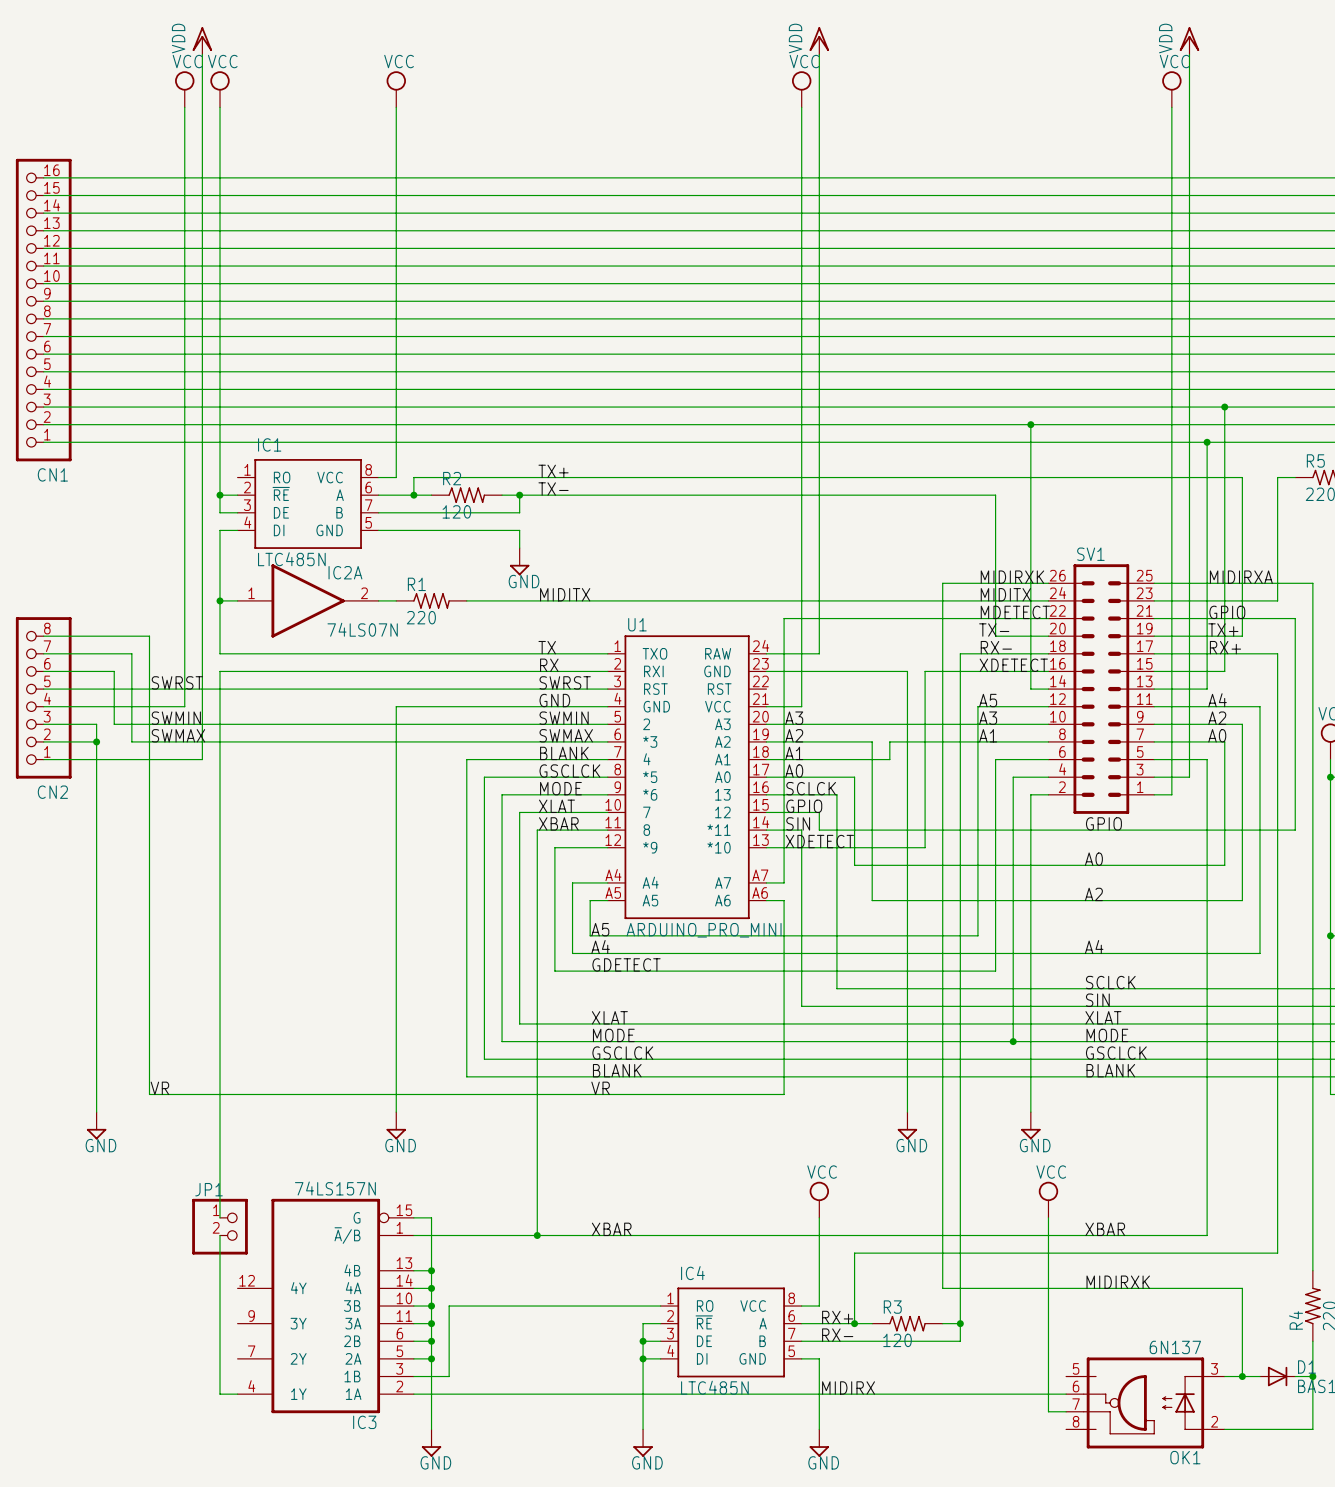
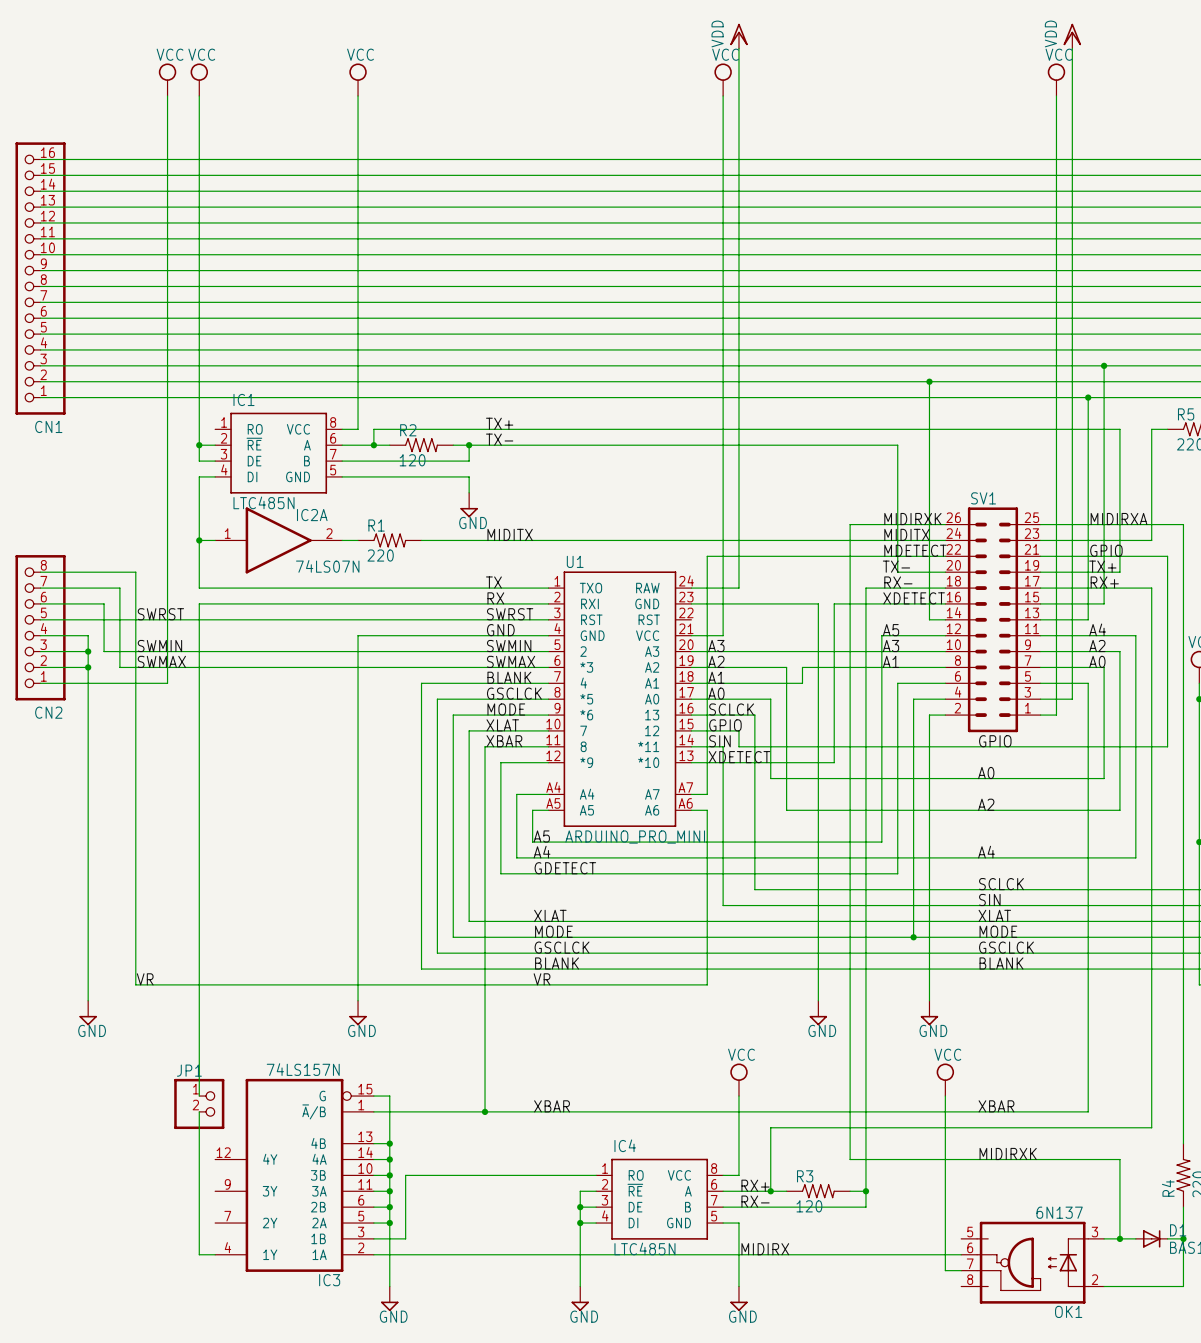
power symbol: VDD (202, 40) -> none
wire: (202, 54) (202, 759) (184, 759) -> (167, 635) (167, 683)
wire: (96, 706) (184, 706) -> (88, 635) (88, 651)
junction: none -> (88, 651)

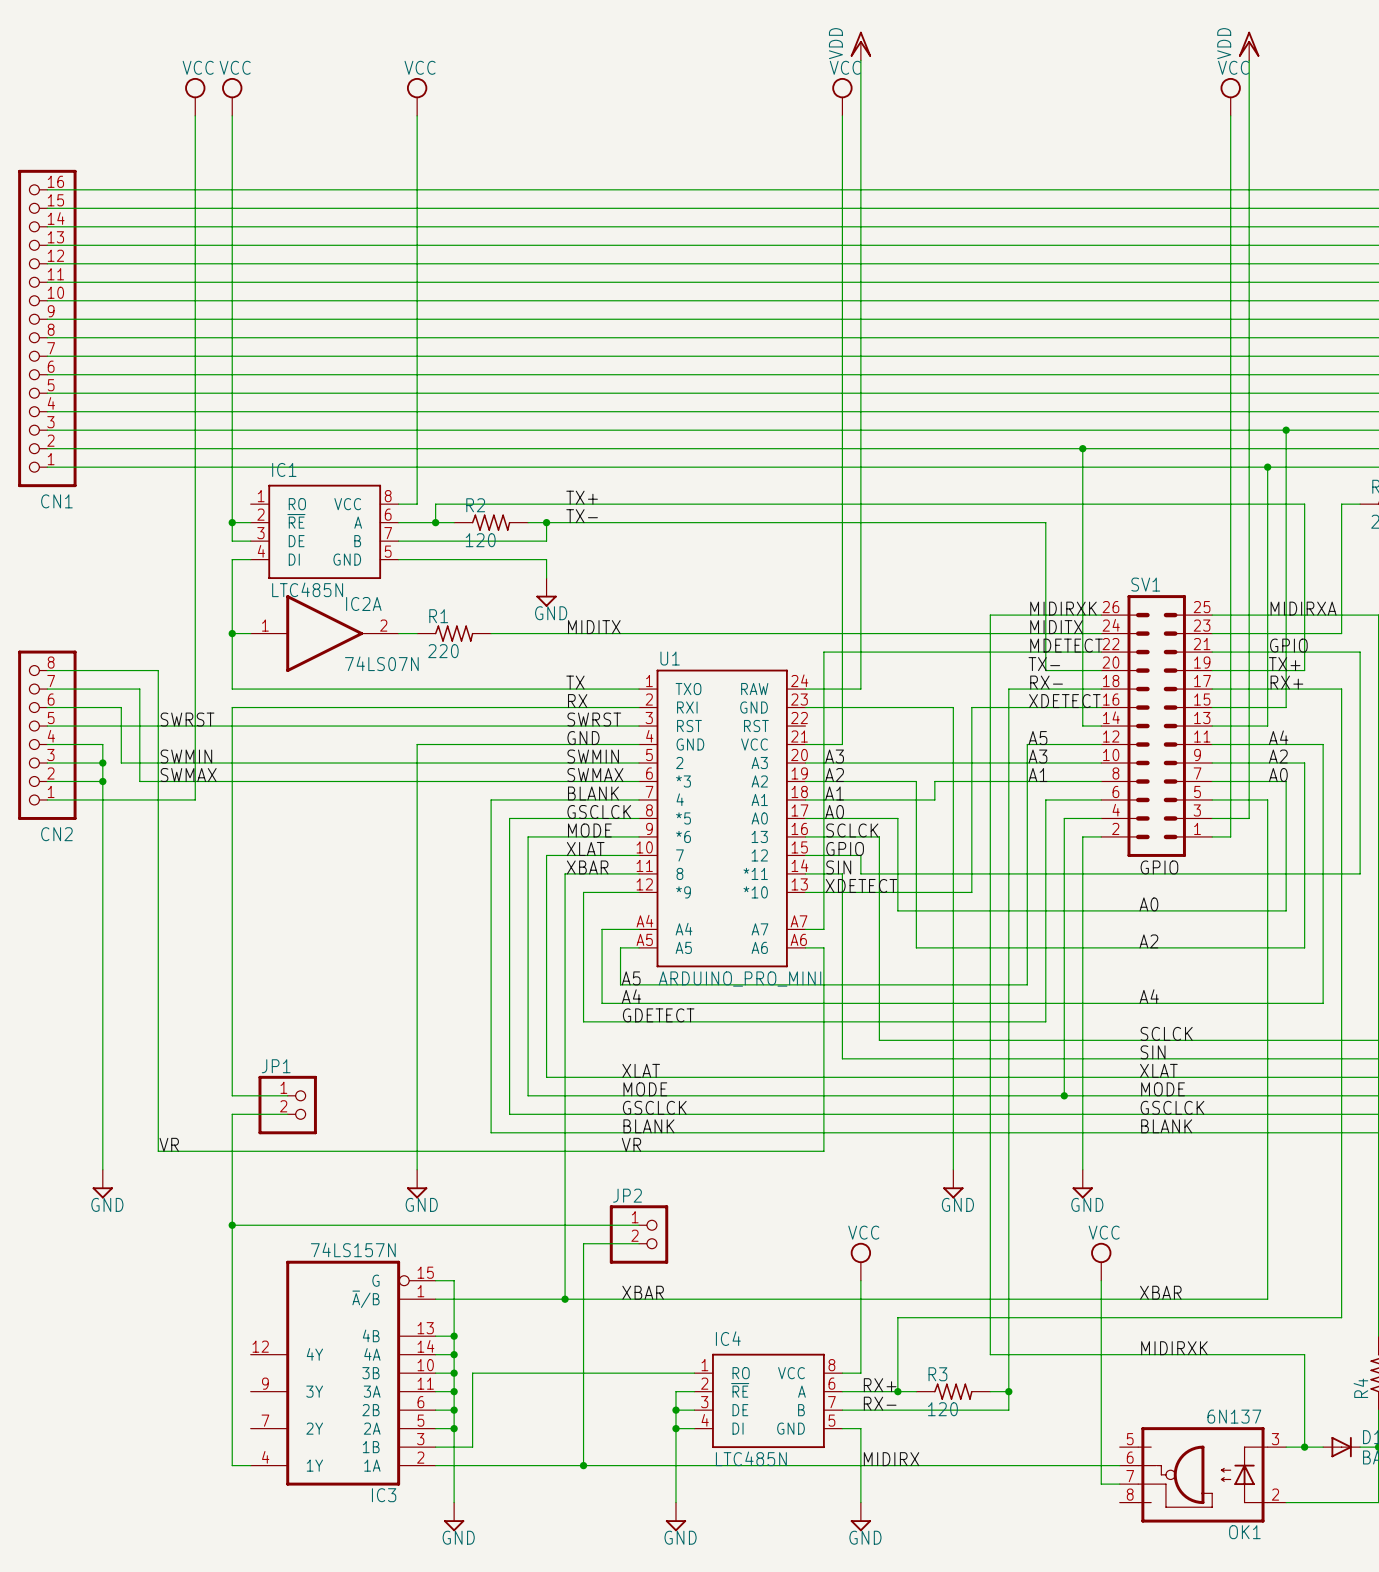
wire: (199, 937) (199, 953) -> (232, 1095) (287, 1095)
wire: none -> (232, 1114) (287, 1114)
wire: none -> (232, 1225) (639, 1225)
junction: none -> (232, 1225)
JP2: none -> (639, 1234)
wire: none -> (639, 1243) (583, 1243) (583, 1465)
wire: none -> (232, 1280) (232, 1299)
JP1 position: (199, 1103) -> (287, 1105)
junction: none -> (583, 1465)

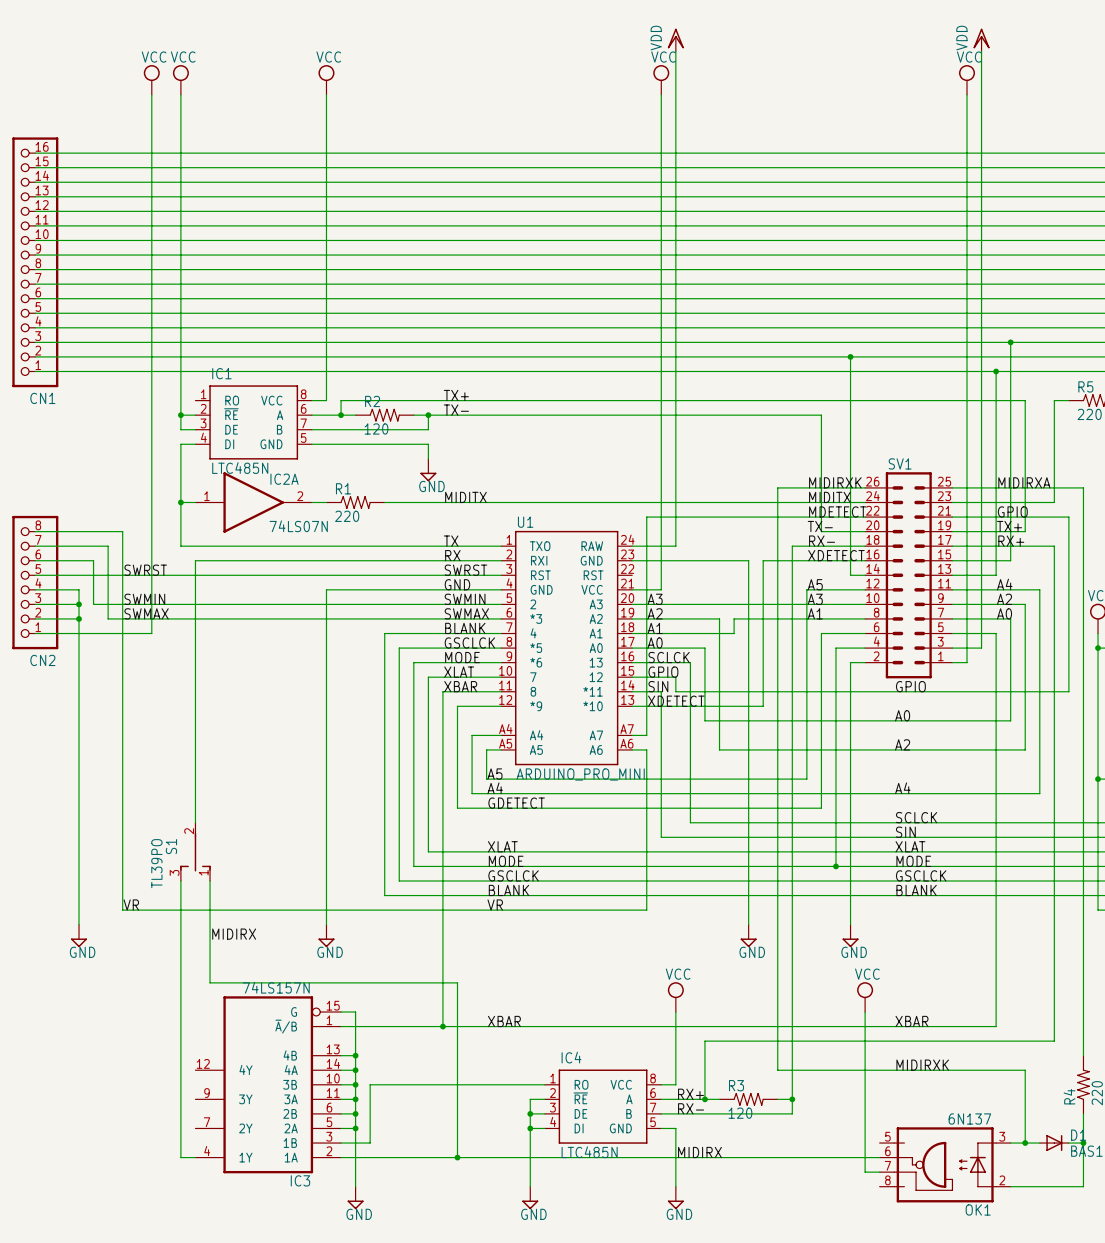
wire: (250, 707) (232, 707) (232, 1095) (287, 1095) -> (195, 560) (195, 822)
S1: none -> TL39PO (195, 851)
JP1: (287, 1105) -> none
wire: (232, 1114) (287, 1114) -> none
label: none -> MIDIRX (234, 934)
wire: (232, 1225) (639, 1225) -> none
junction: (232, 1225) -> none
JP2: (639, 1234) -> none
wire: (583, 1243) (639, 1243) -> (457, 982) (210, 982) (210, 880)

